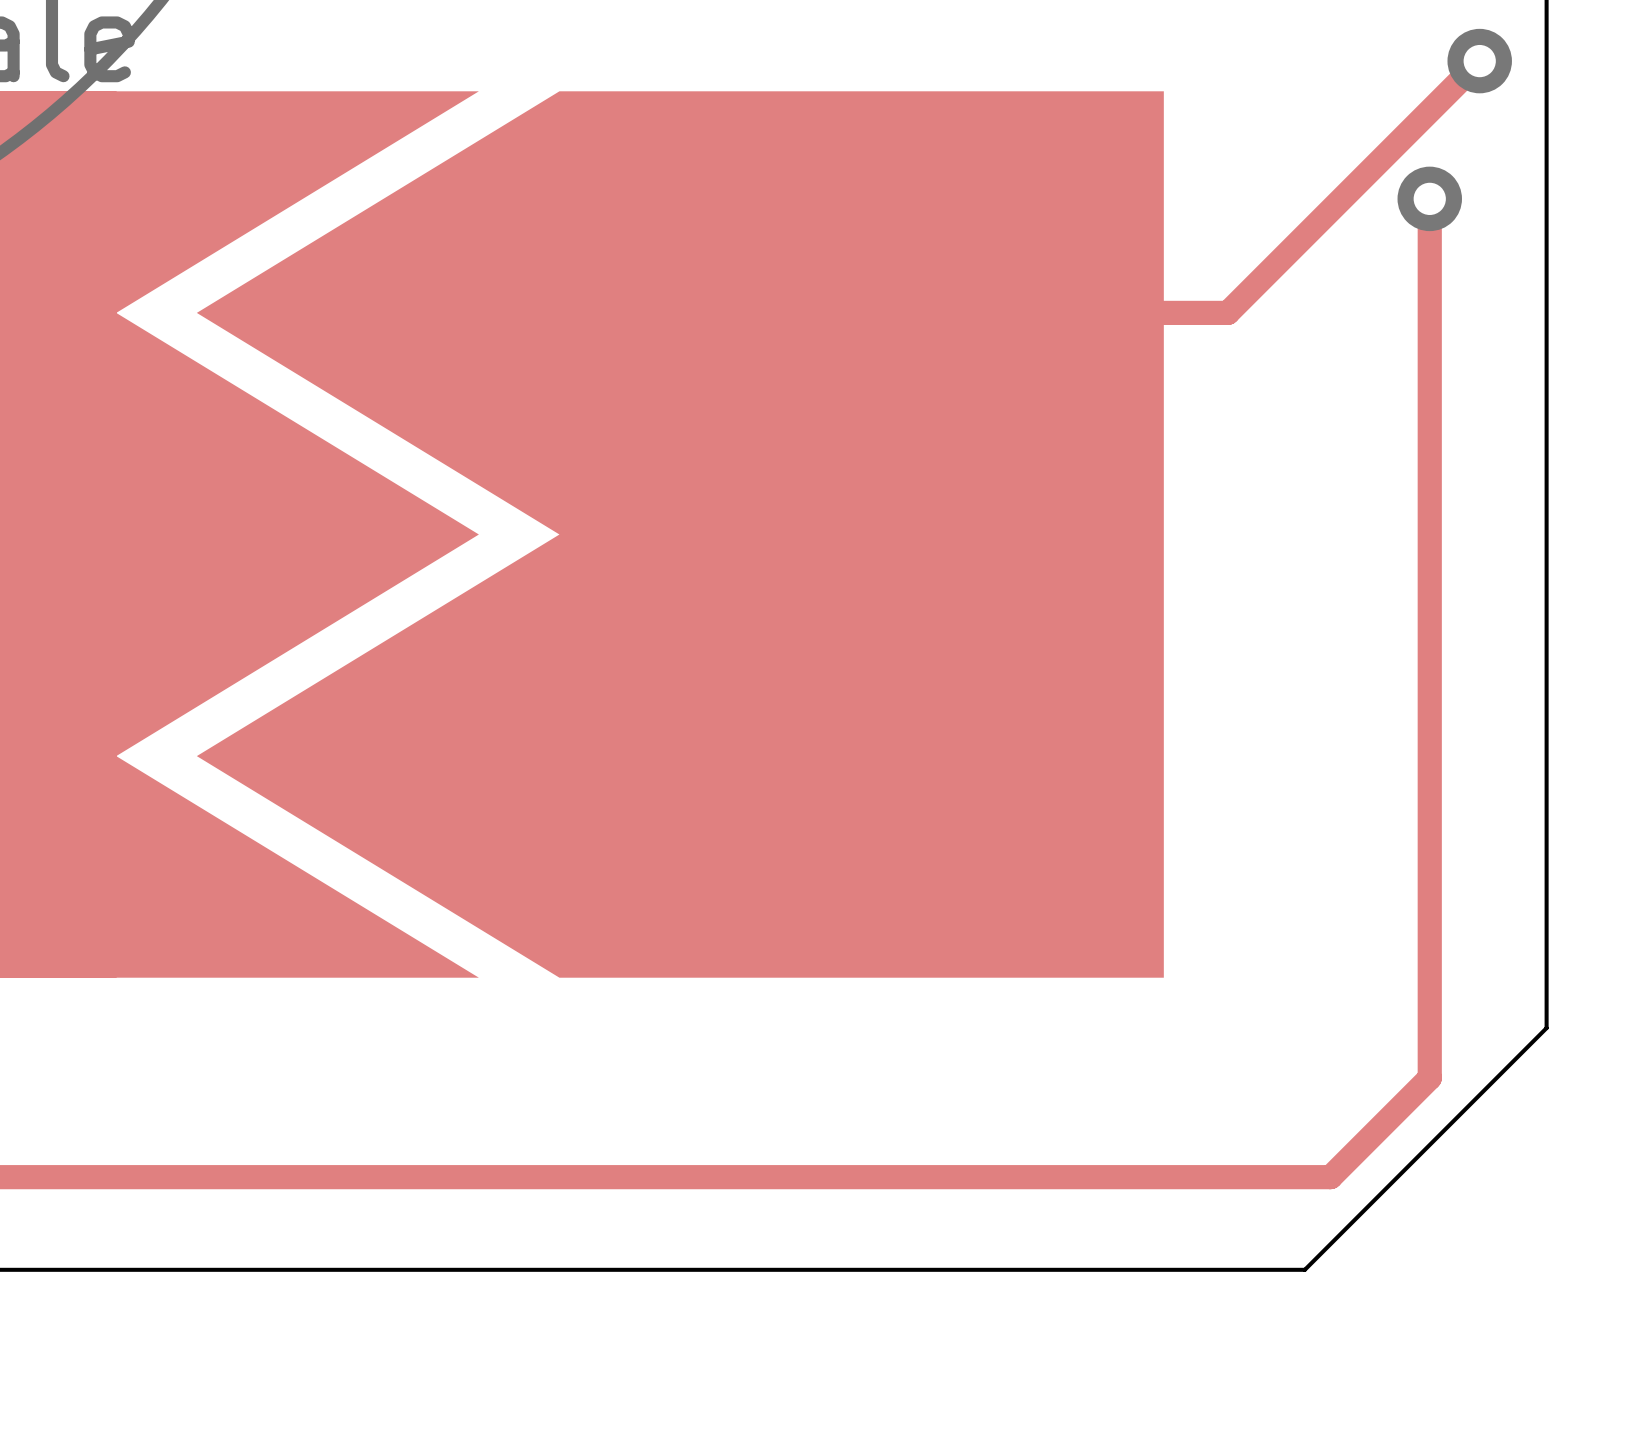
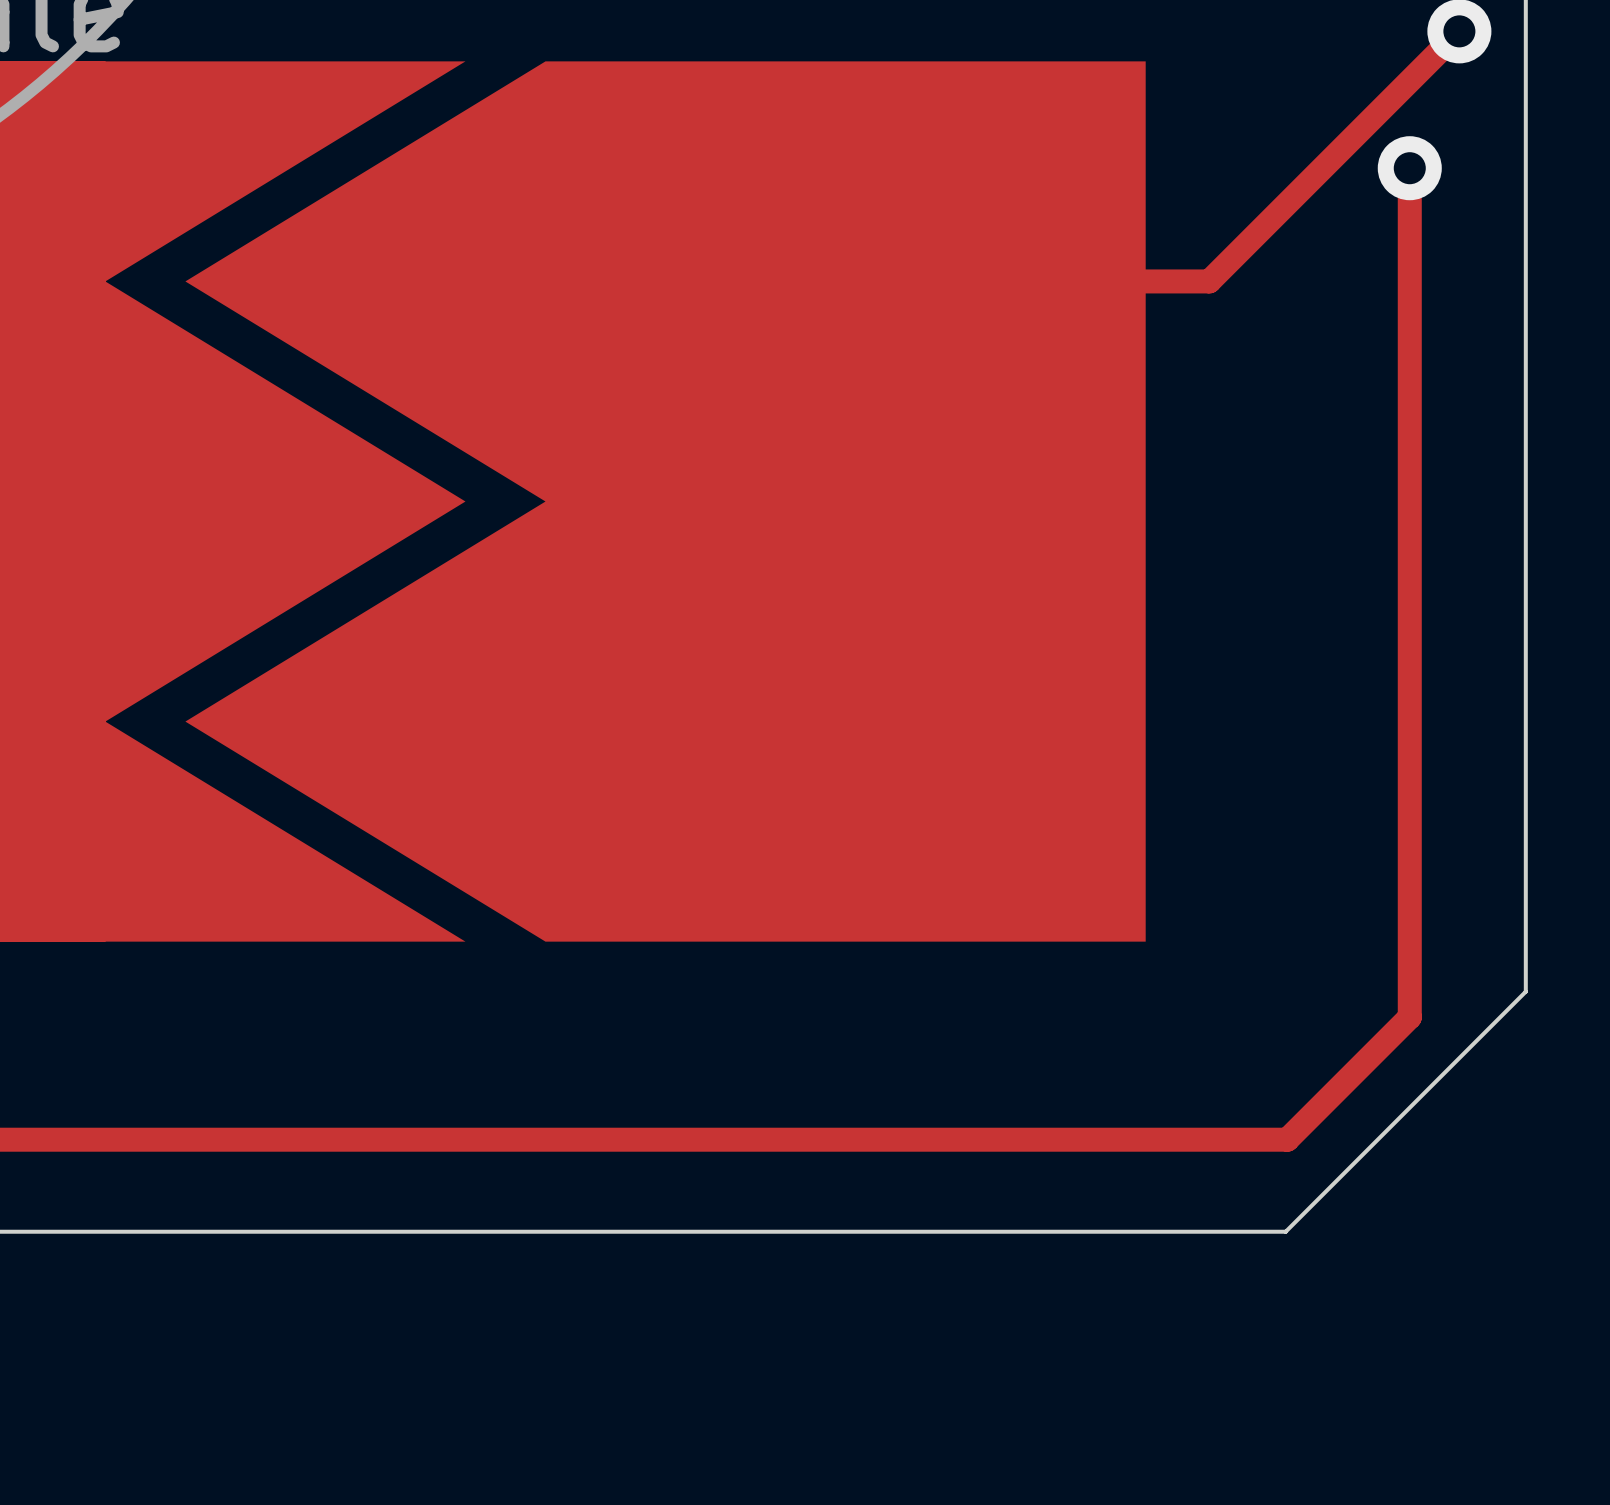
track: (1429, 1053) (1429, 1078) (1330, 1177) (1306, 1177) -> (1409, 1017) (1287, 1139)

